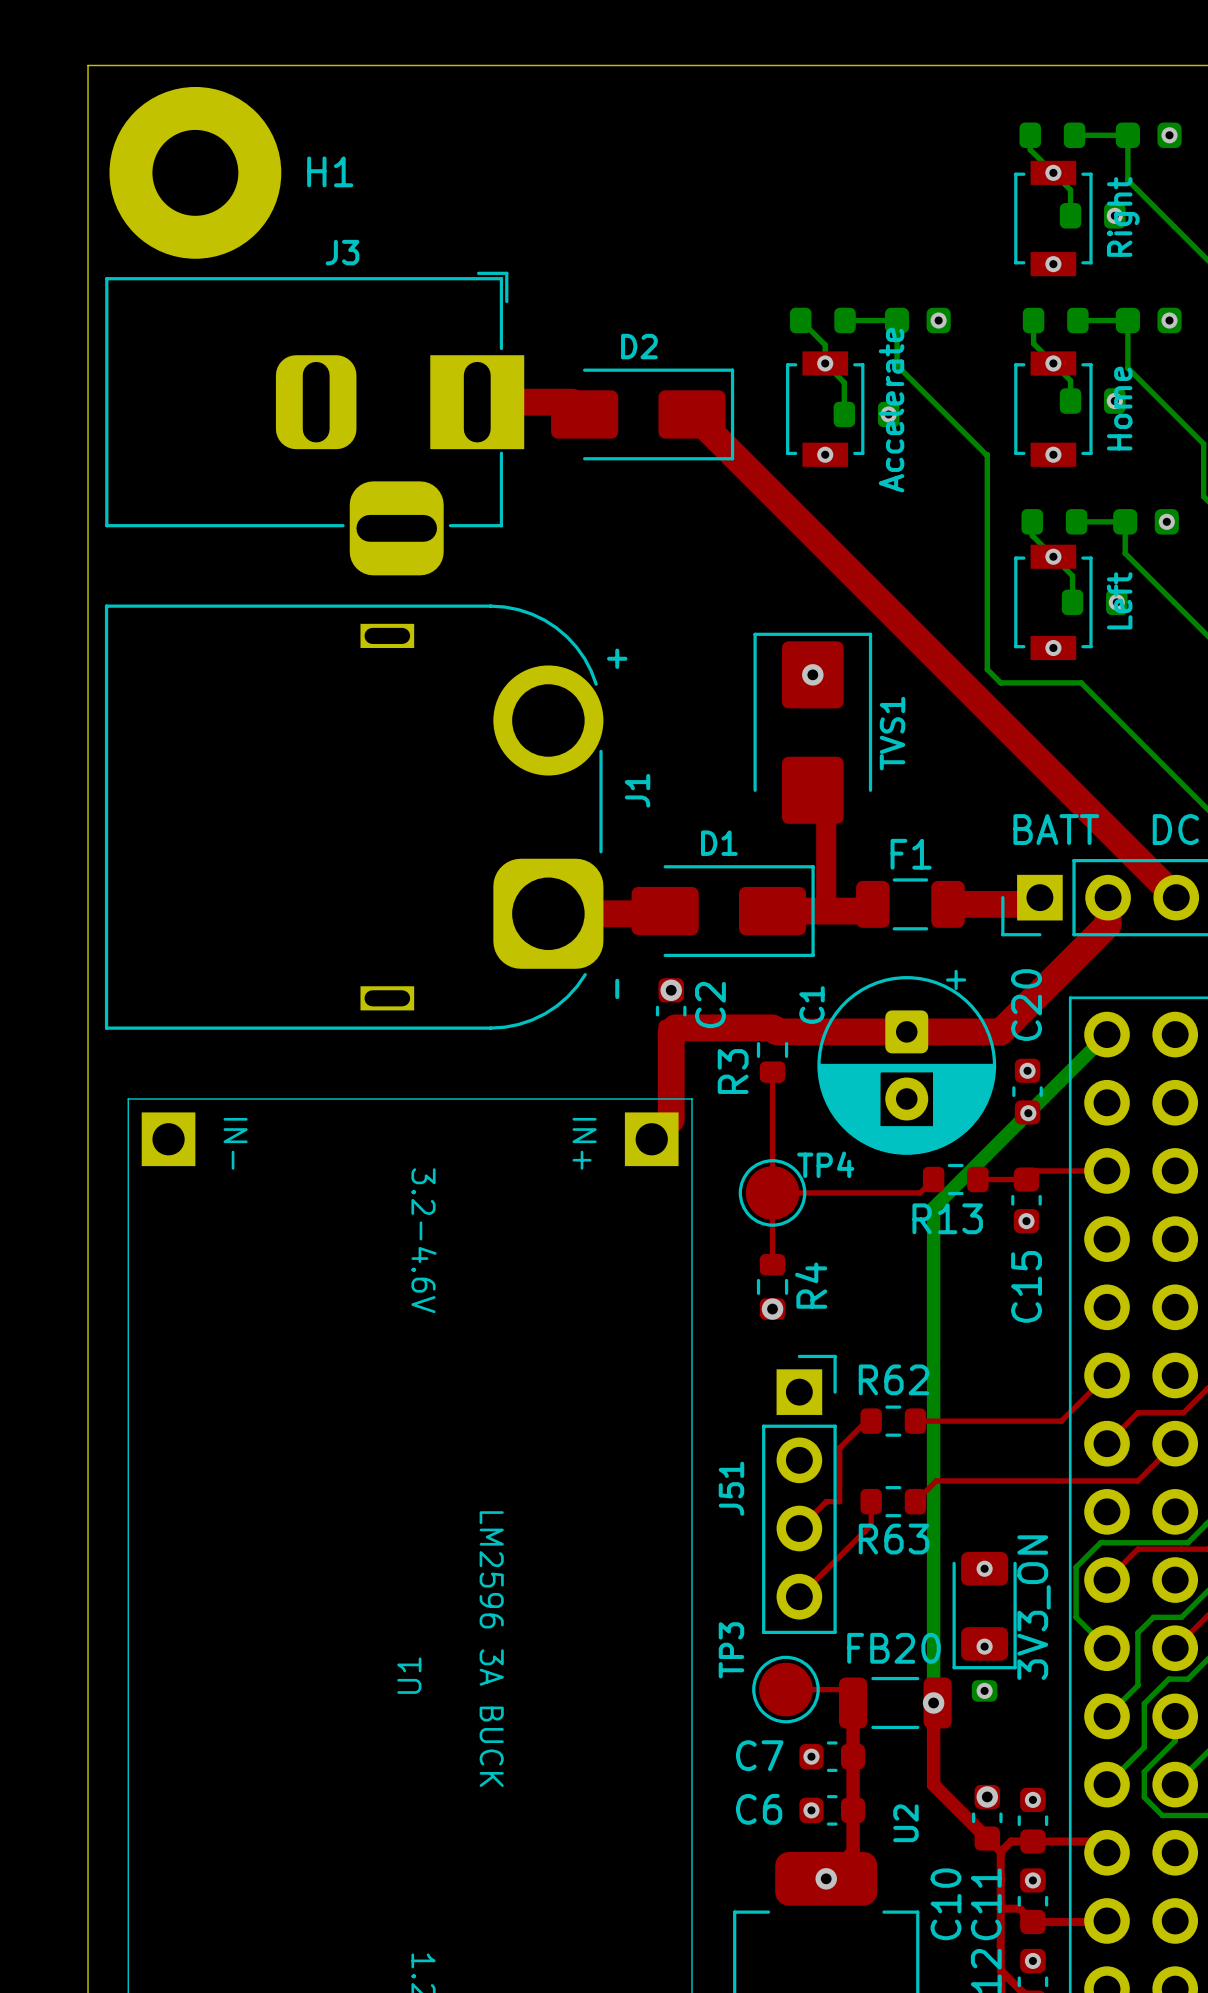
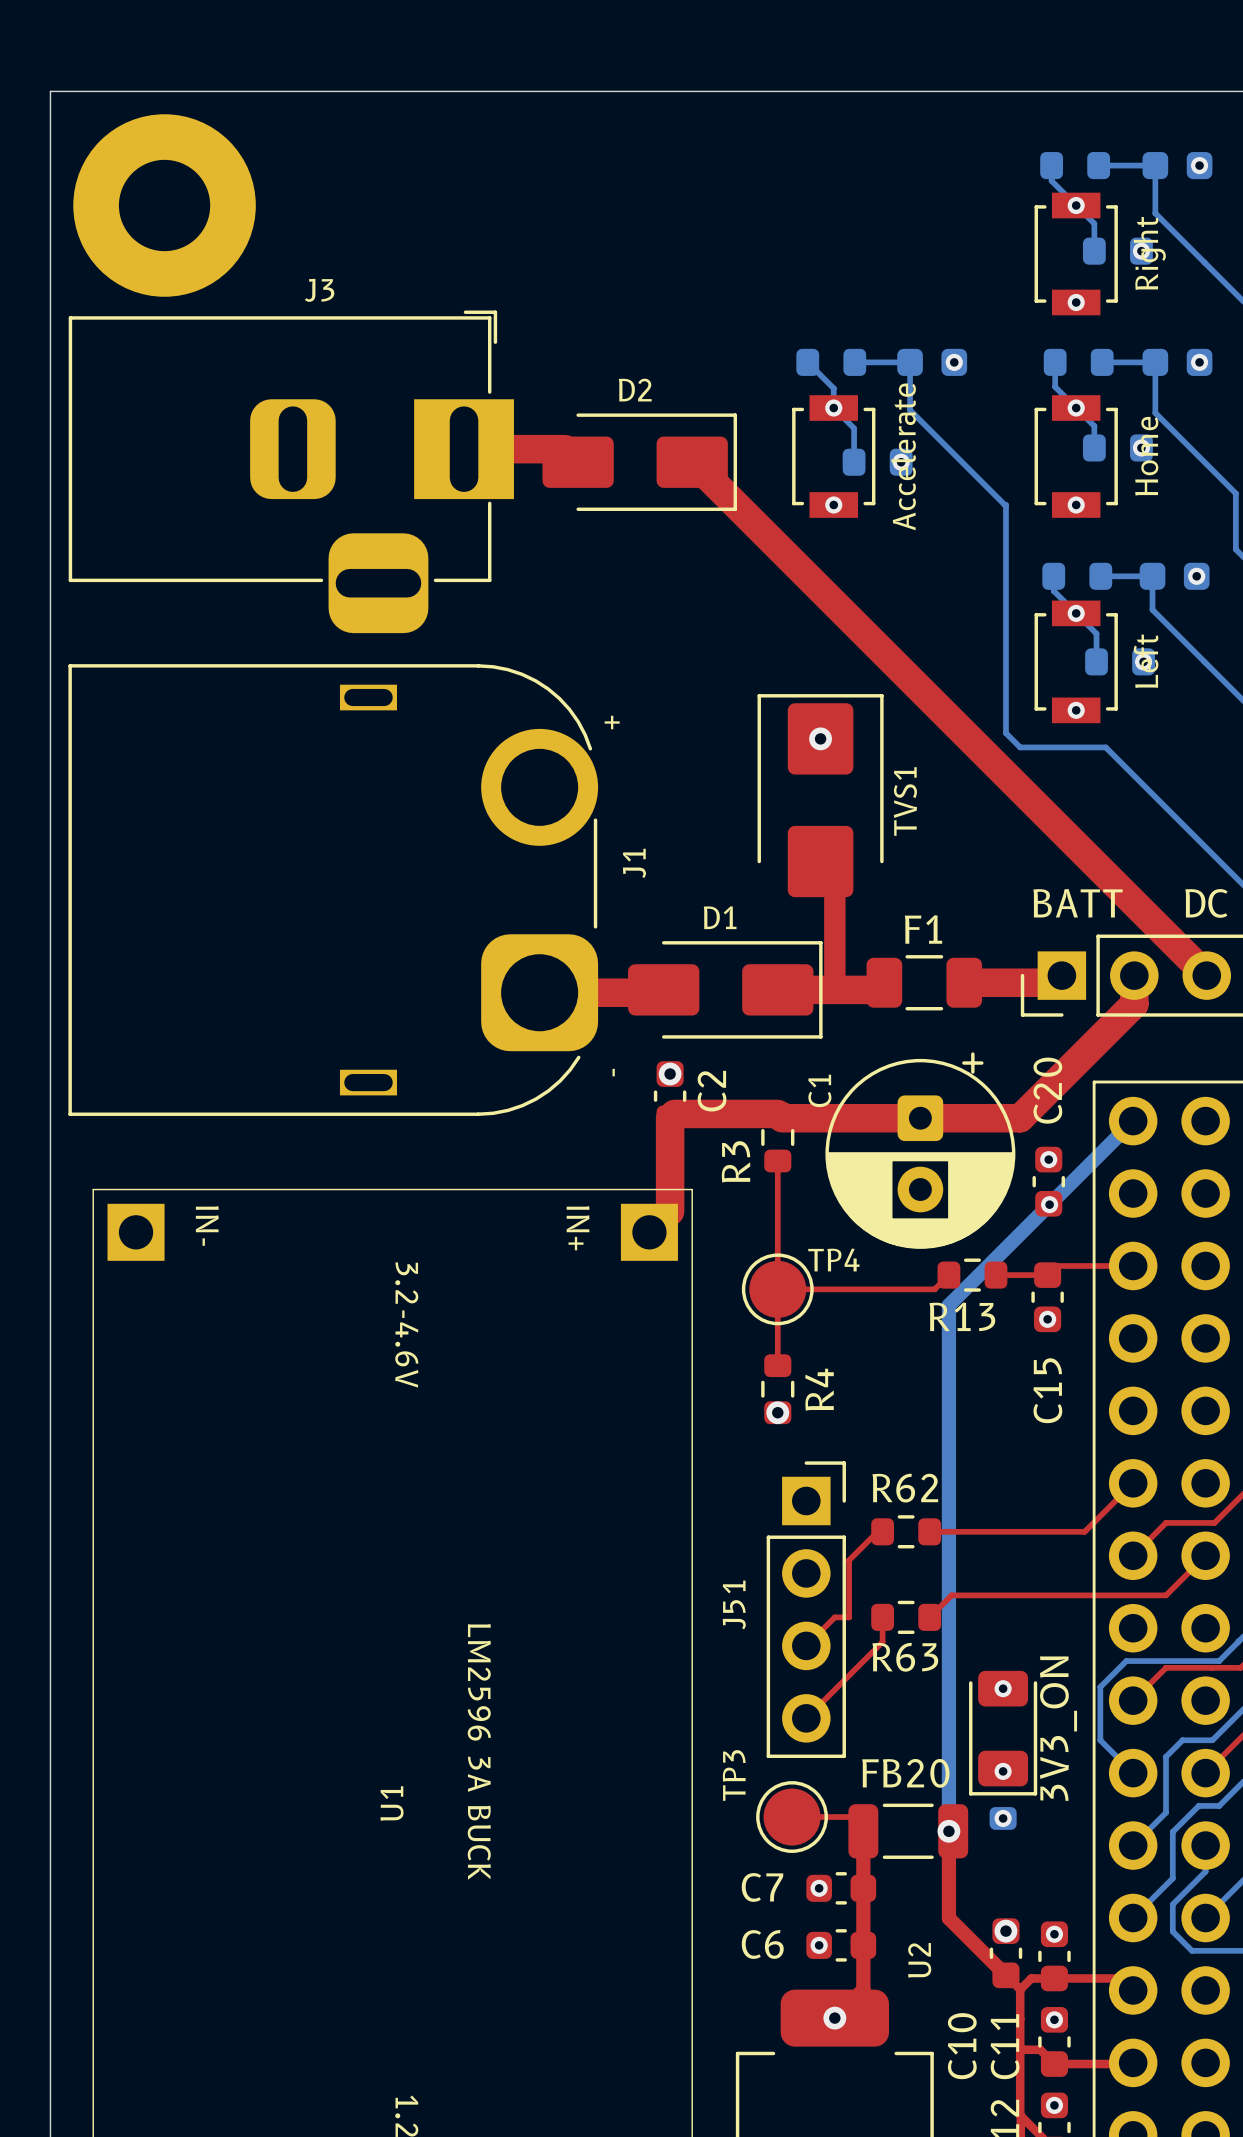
H1 name: H1 (330, 171) -> none

